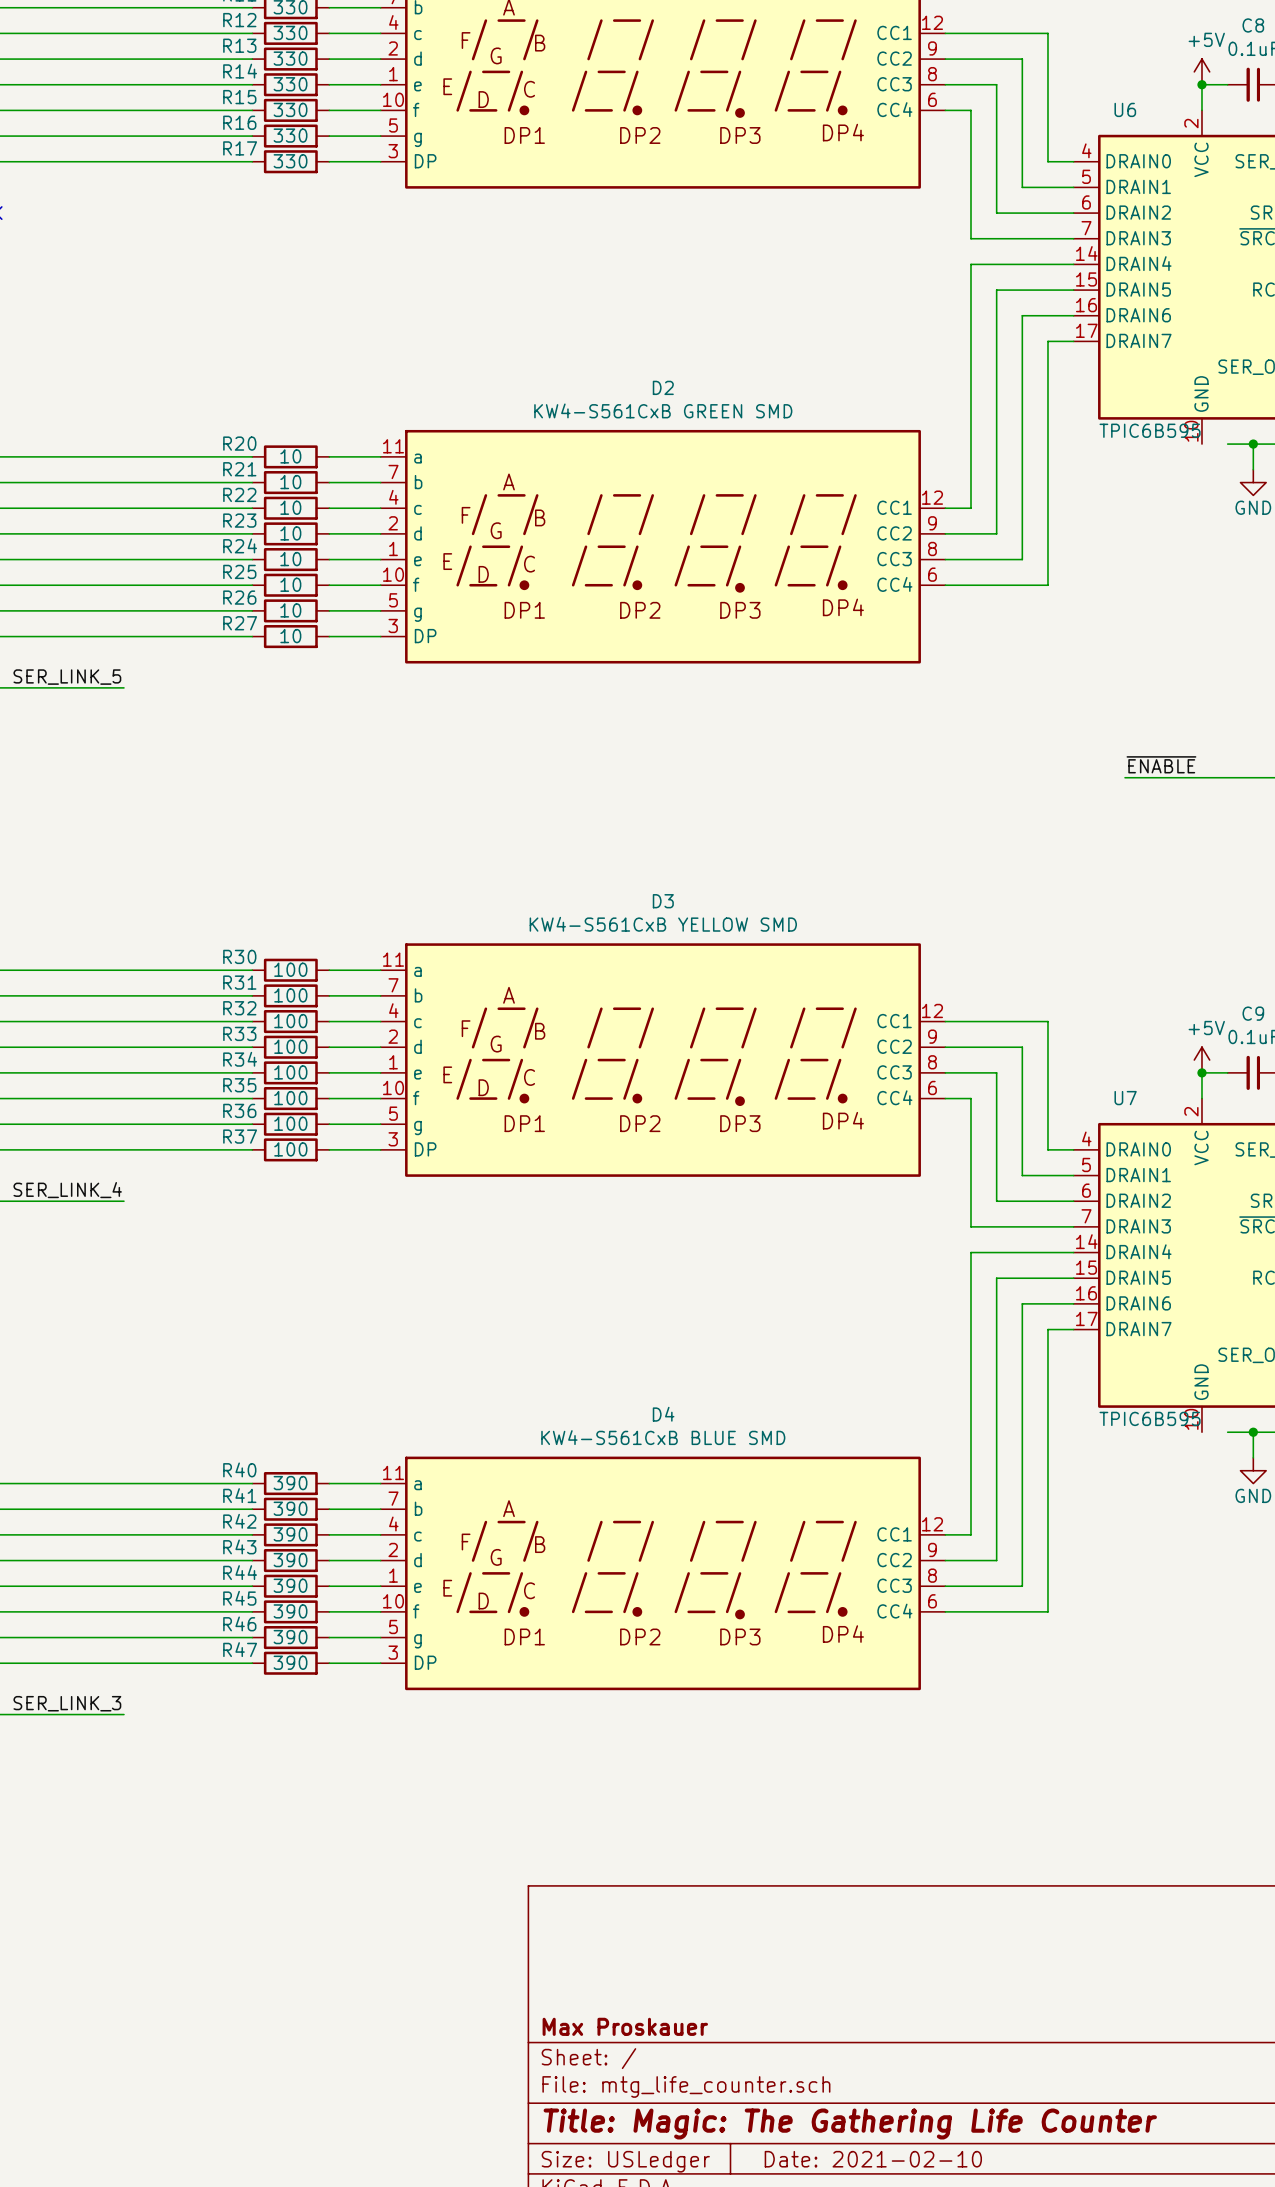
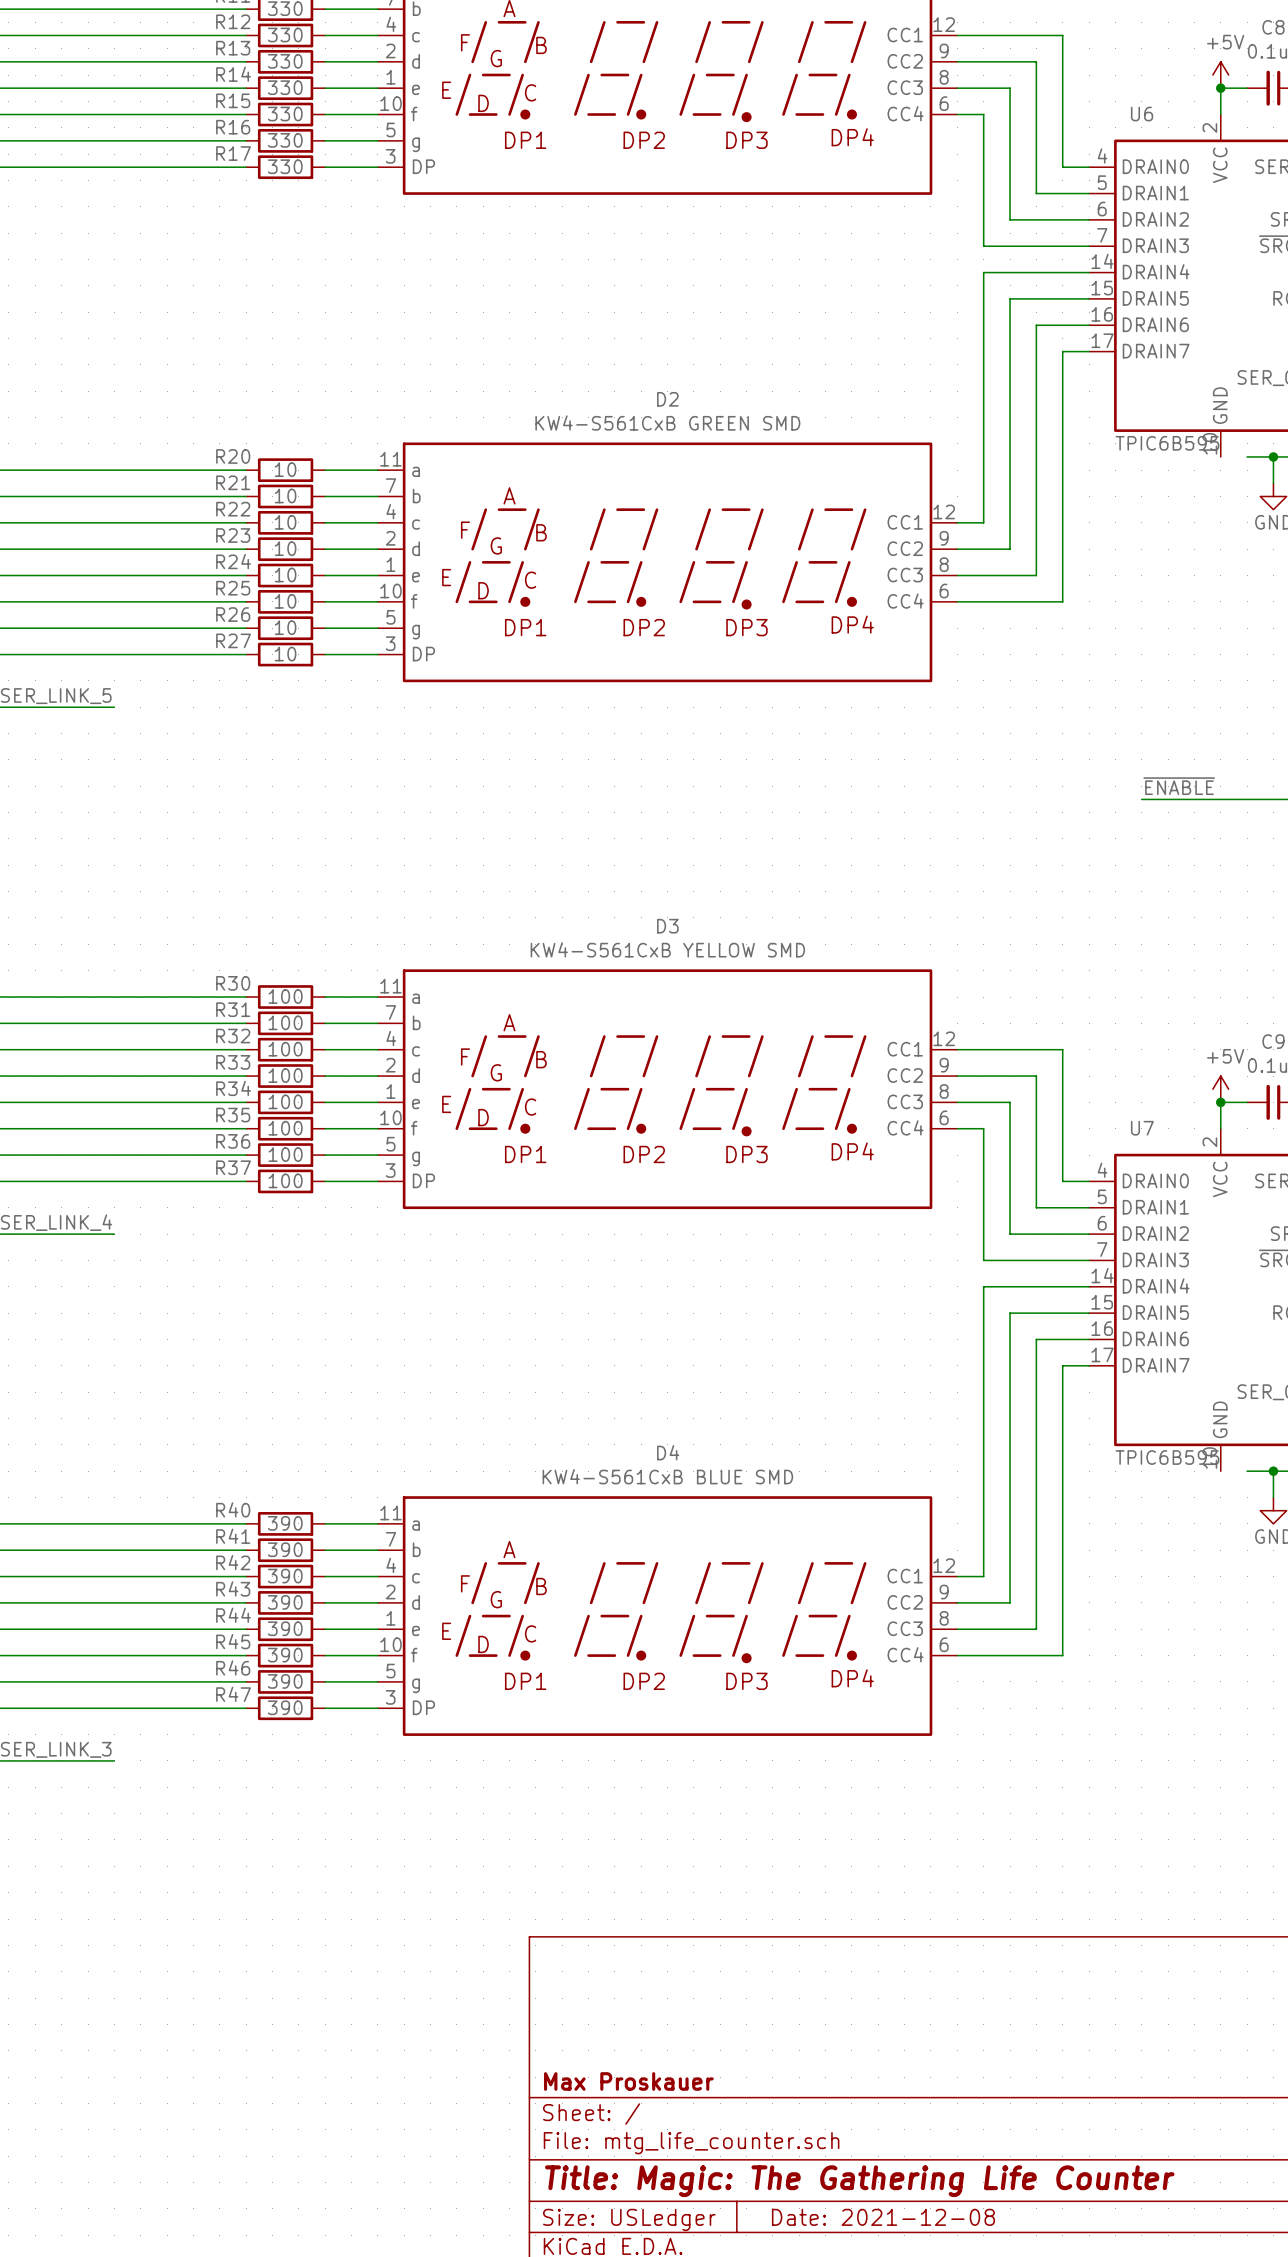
title block: Date: 2021-02-10 (873, 2159) -> Date: 2021-12-08 (883, 2217)

